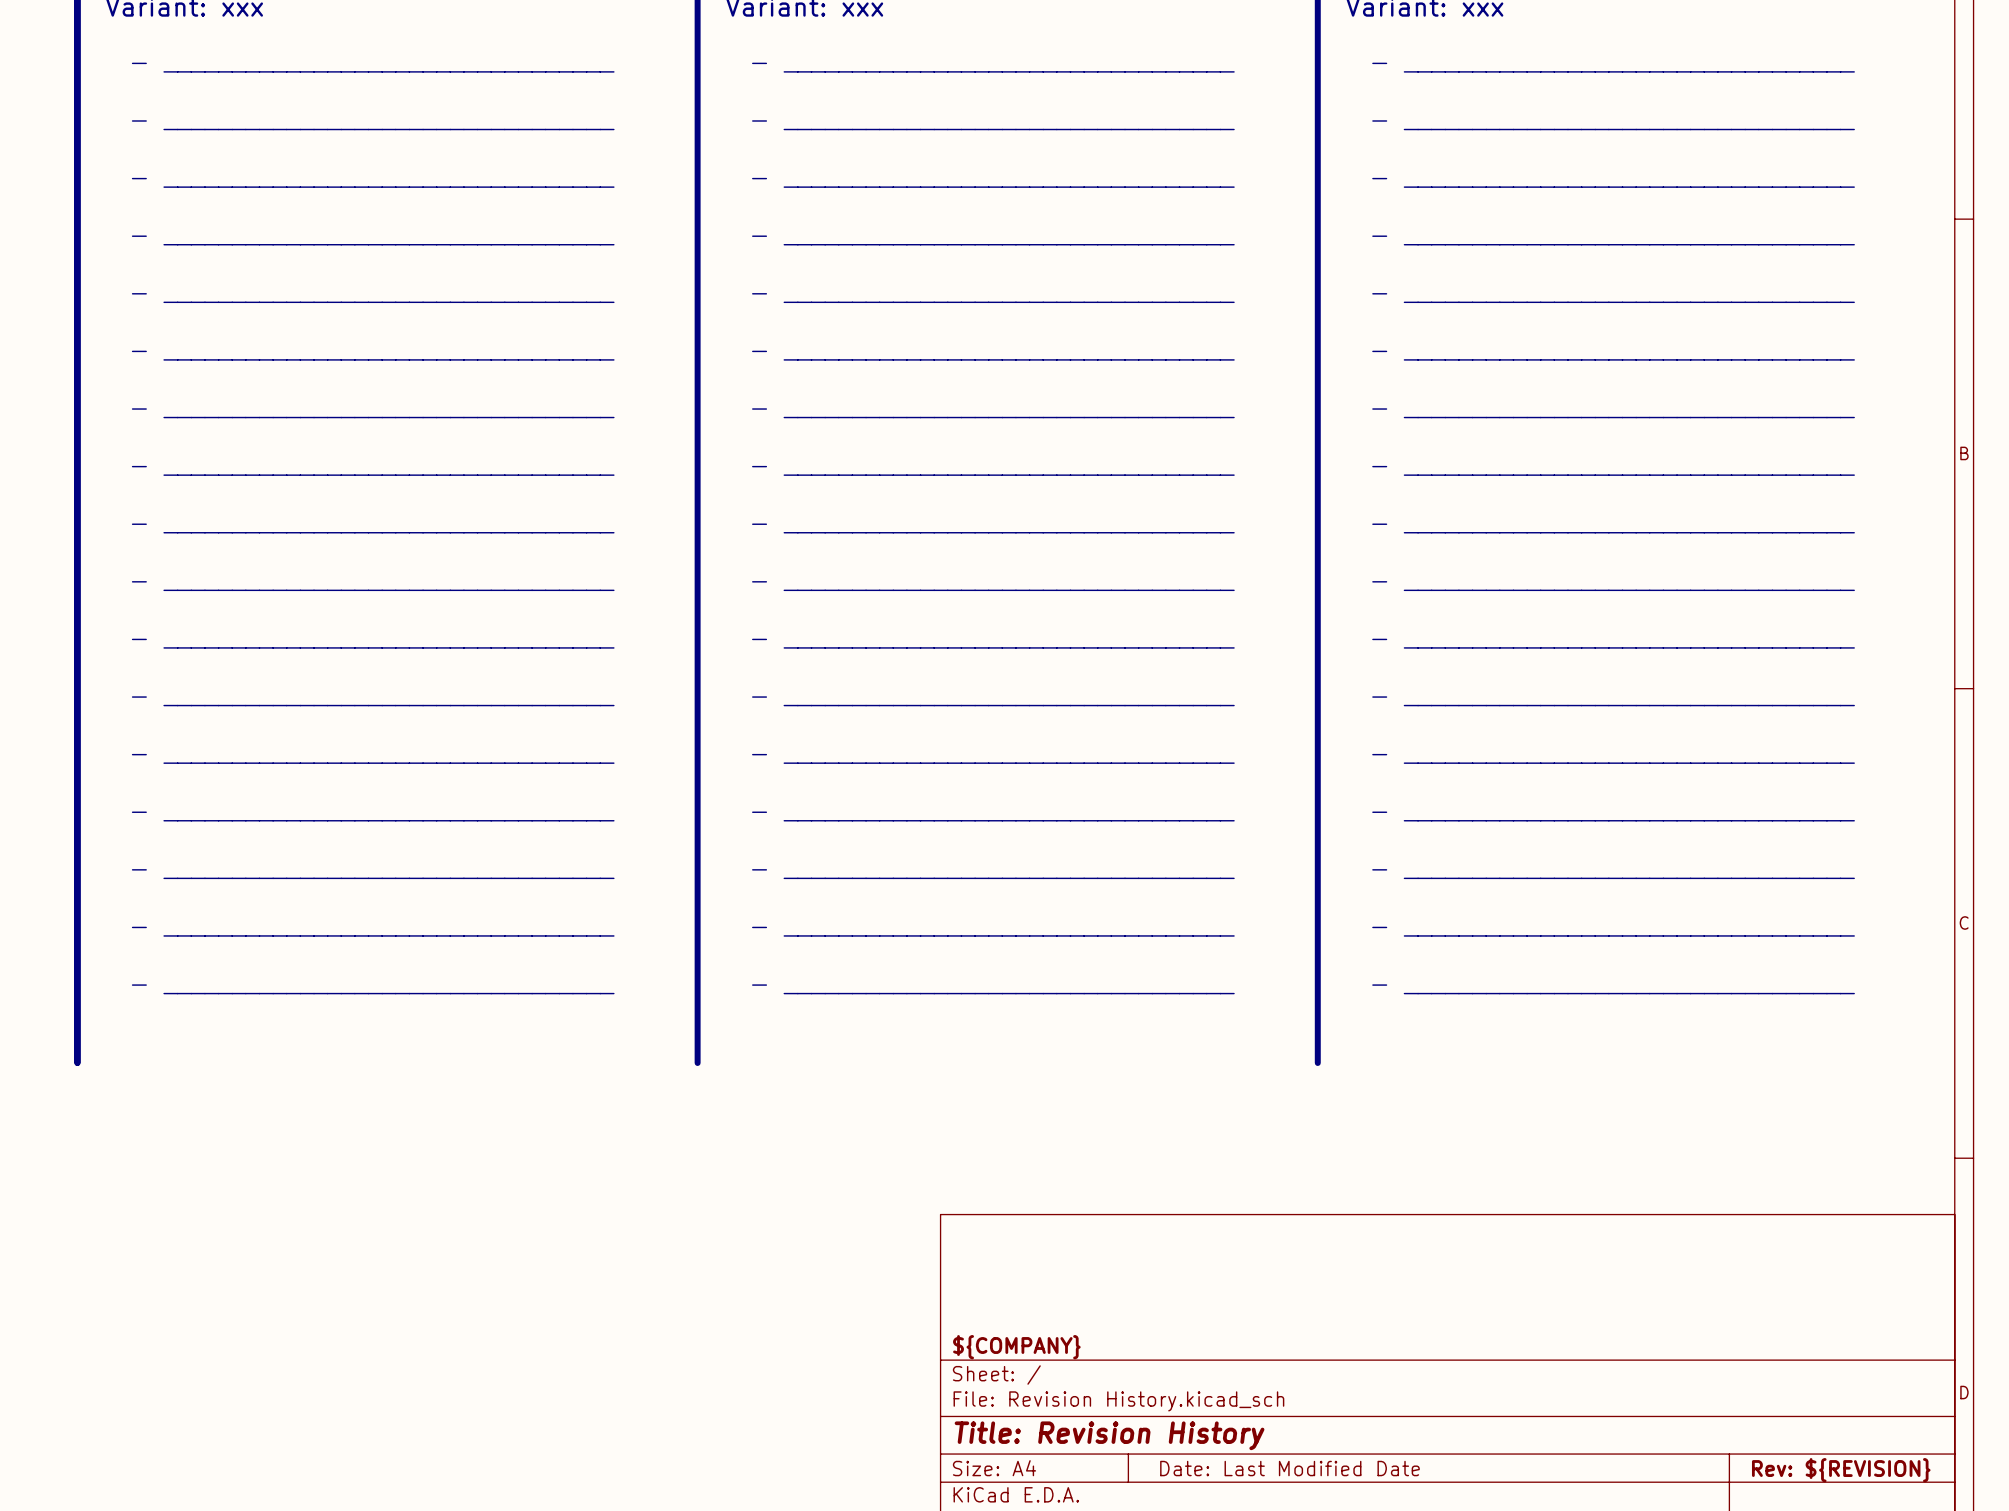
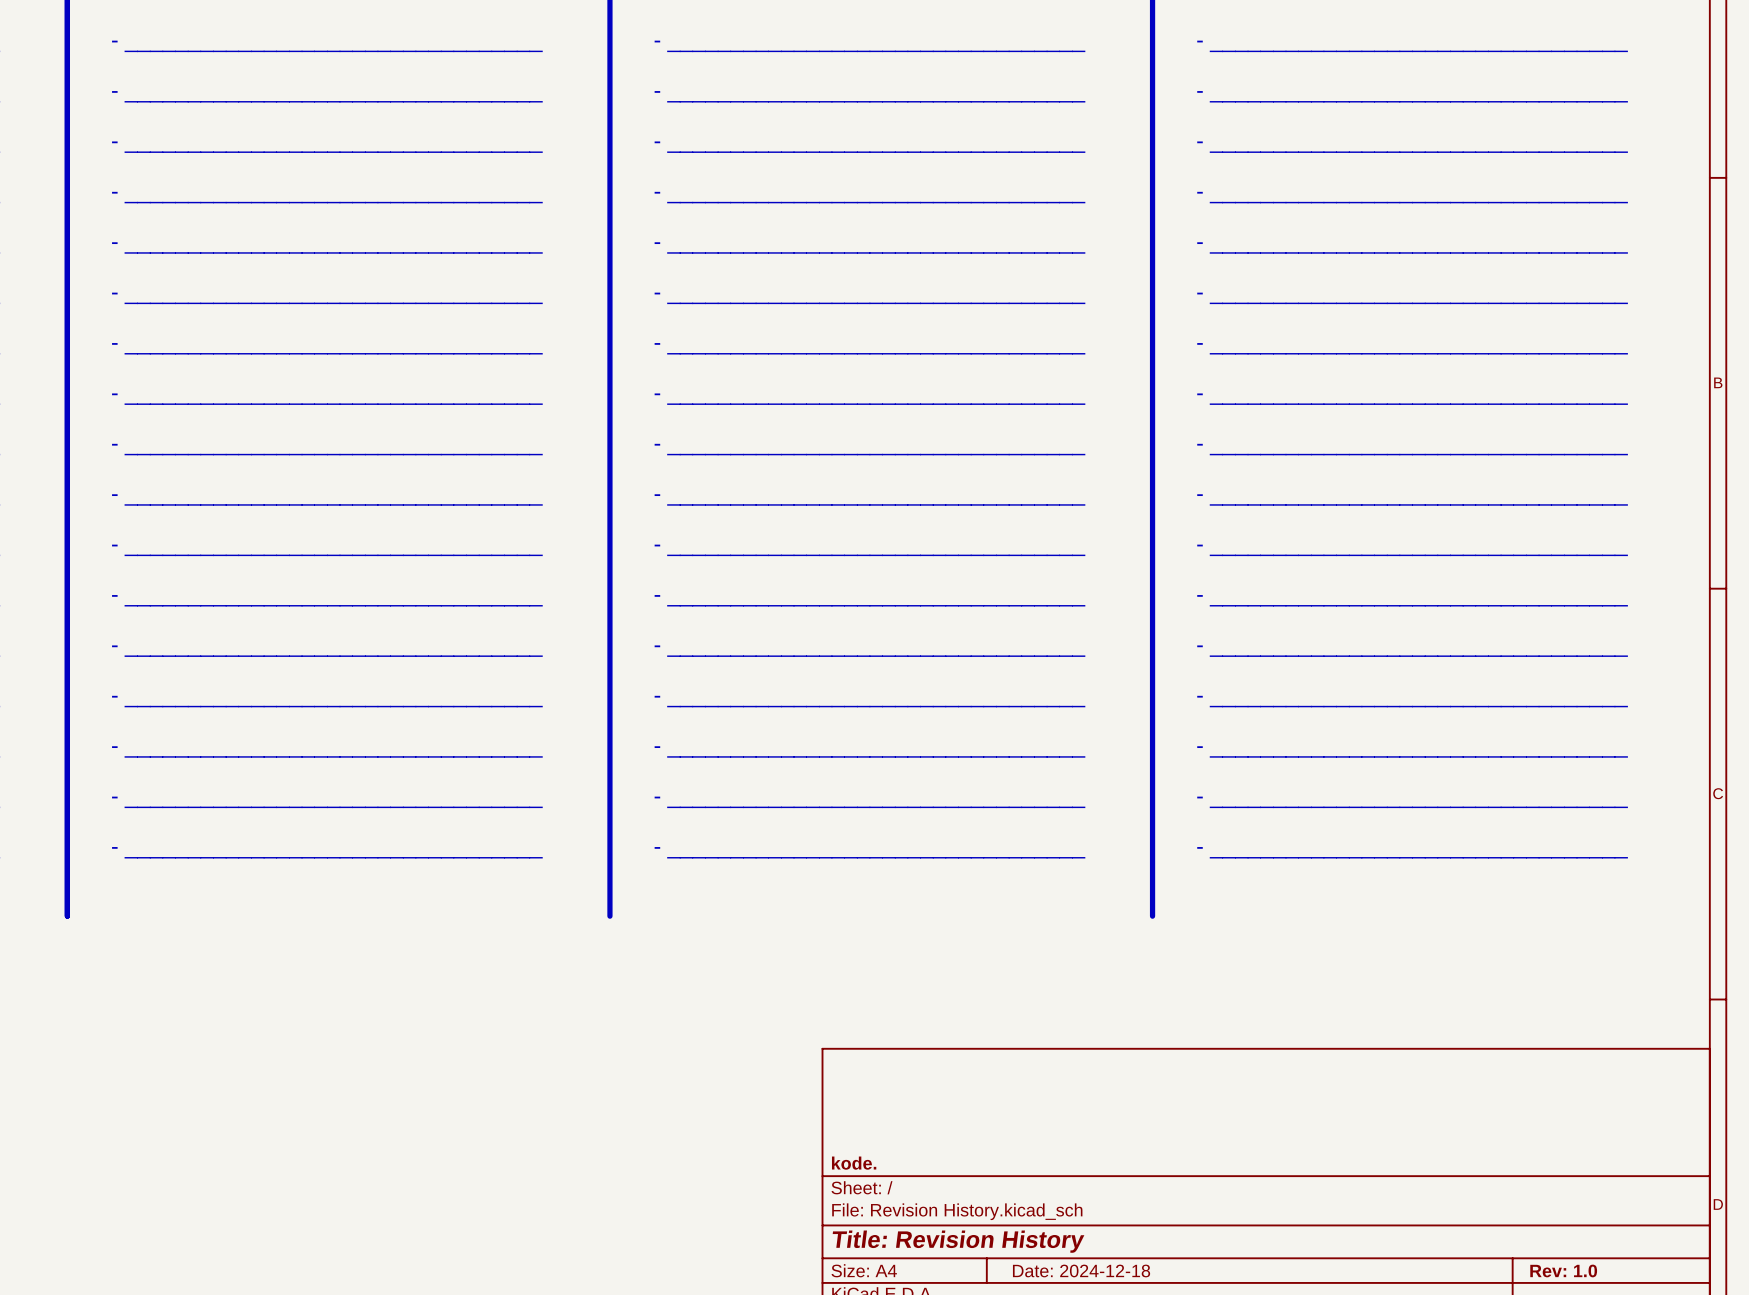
title block: ${COMPANY} (1016, 1347) -> kode. (854, 1163)
title block: Date: Last Modified Date (1289, 1468) -> Date: 2024-12-18 (1081, 1270)
title block: Rev: ${REVISION} (1841, 1470) -> Rev: 1.0 (1563, 1270)

